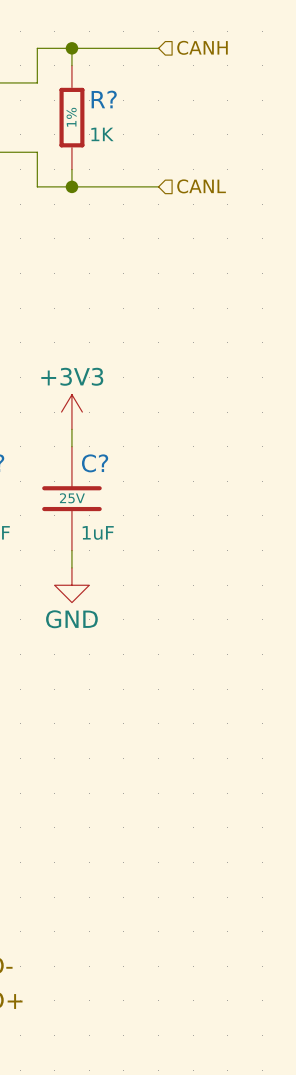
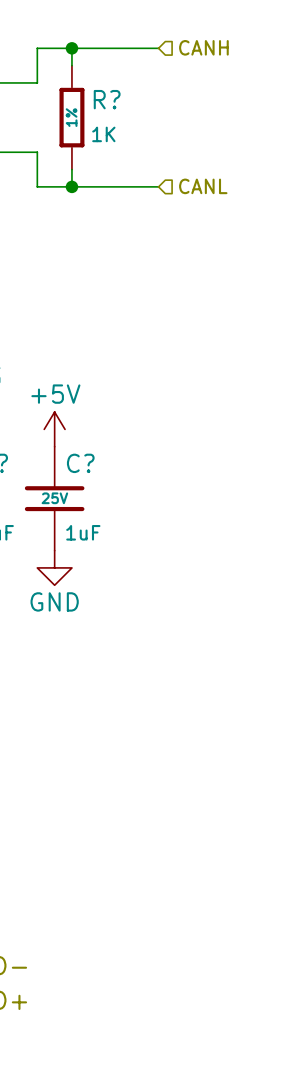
power symbol: +3V3 (71, 412) -> none
power symbol: none -> +5V (54, 429)
wire: (71, 429) (71, 446) -> none
C? position: (71, 498) -> (54, 498)
wire: (71, 550) (71, 567) -> none
power symbol position: GND (71, 585) -> GND (54, 567)

